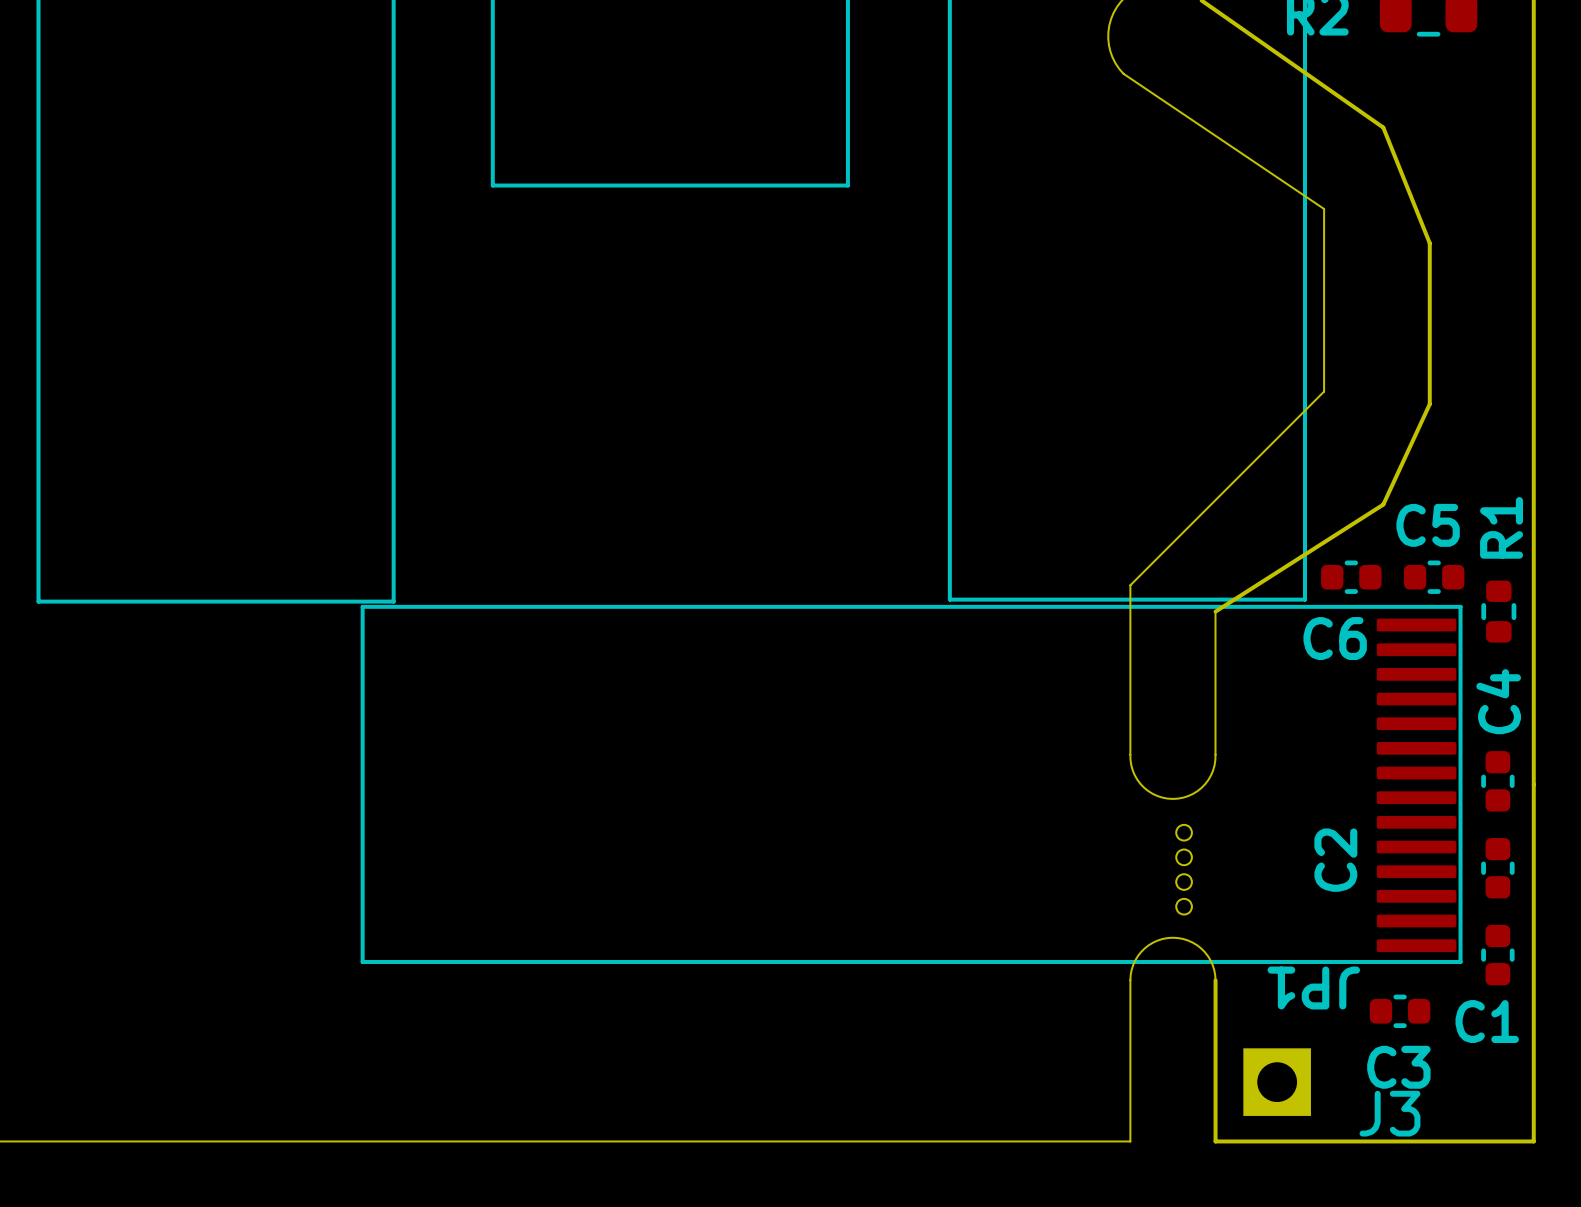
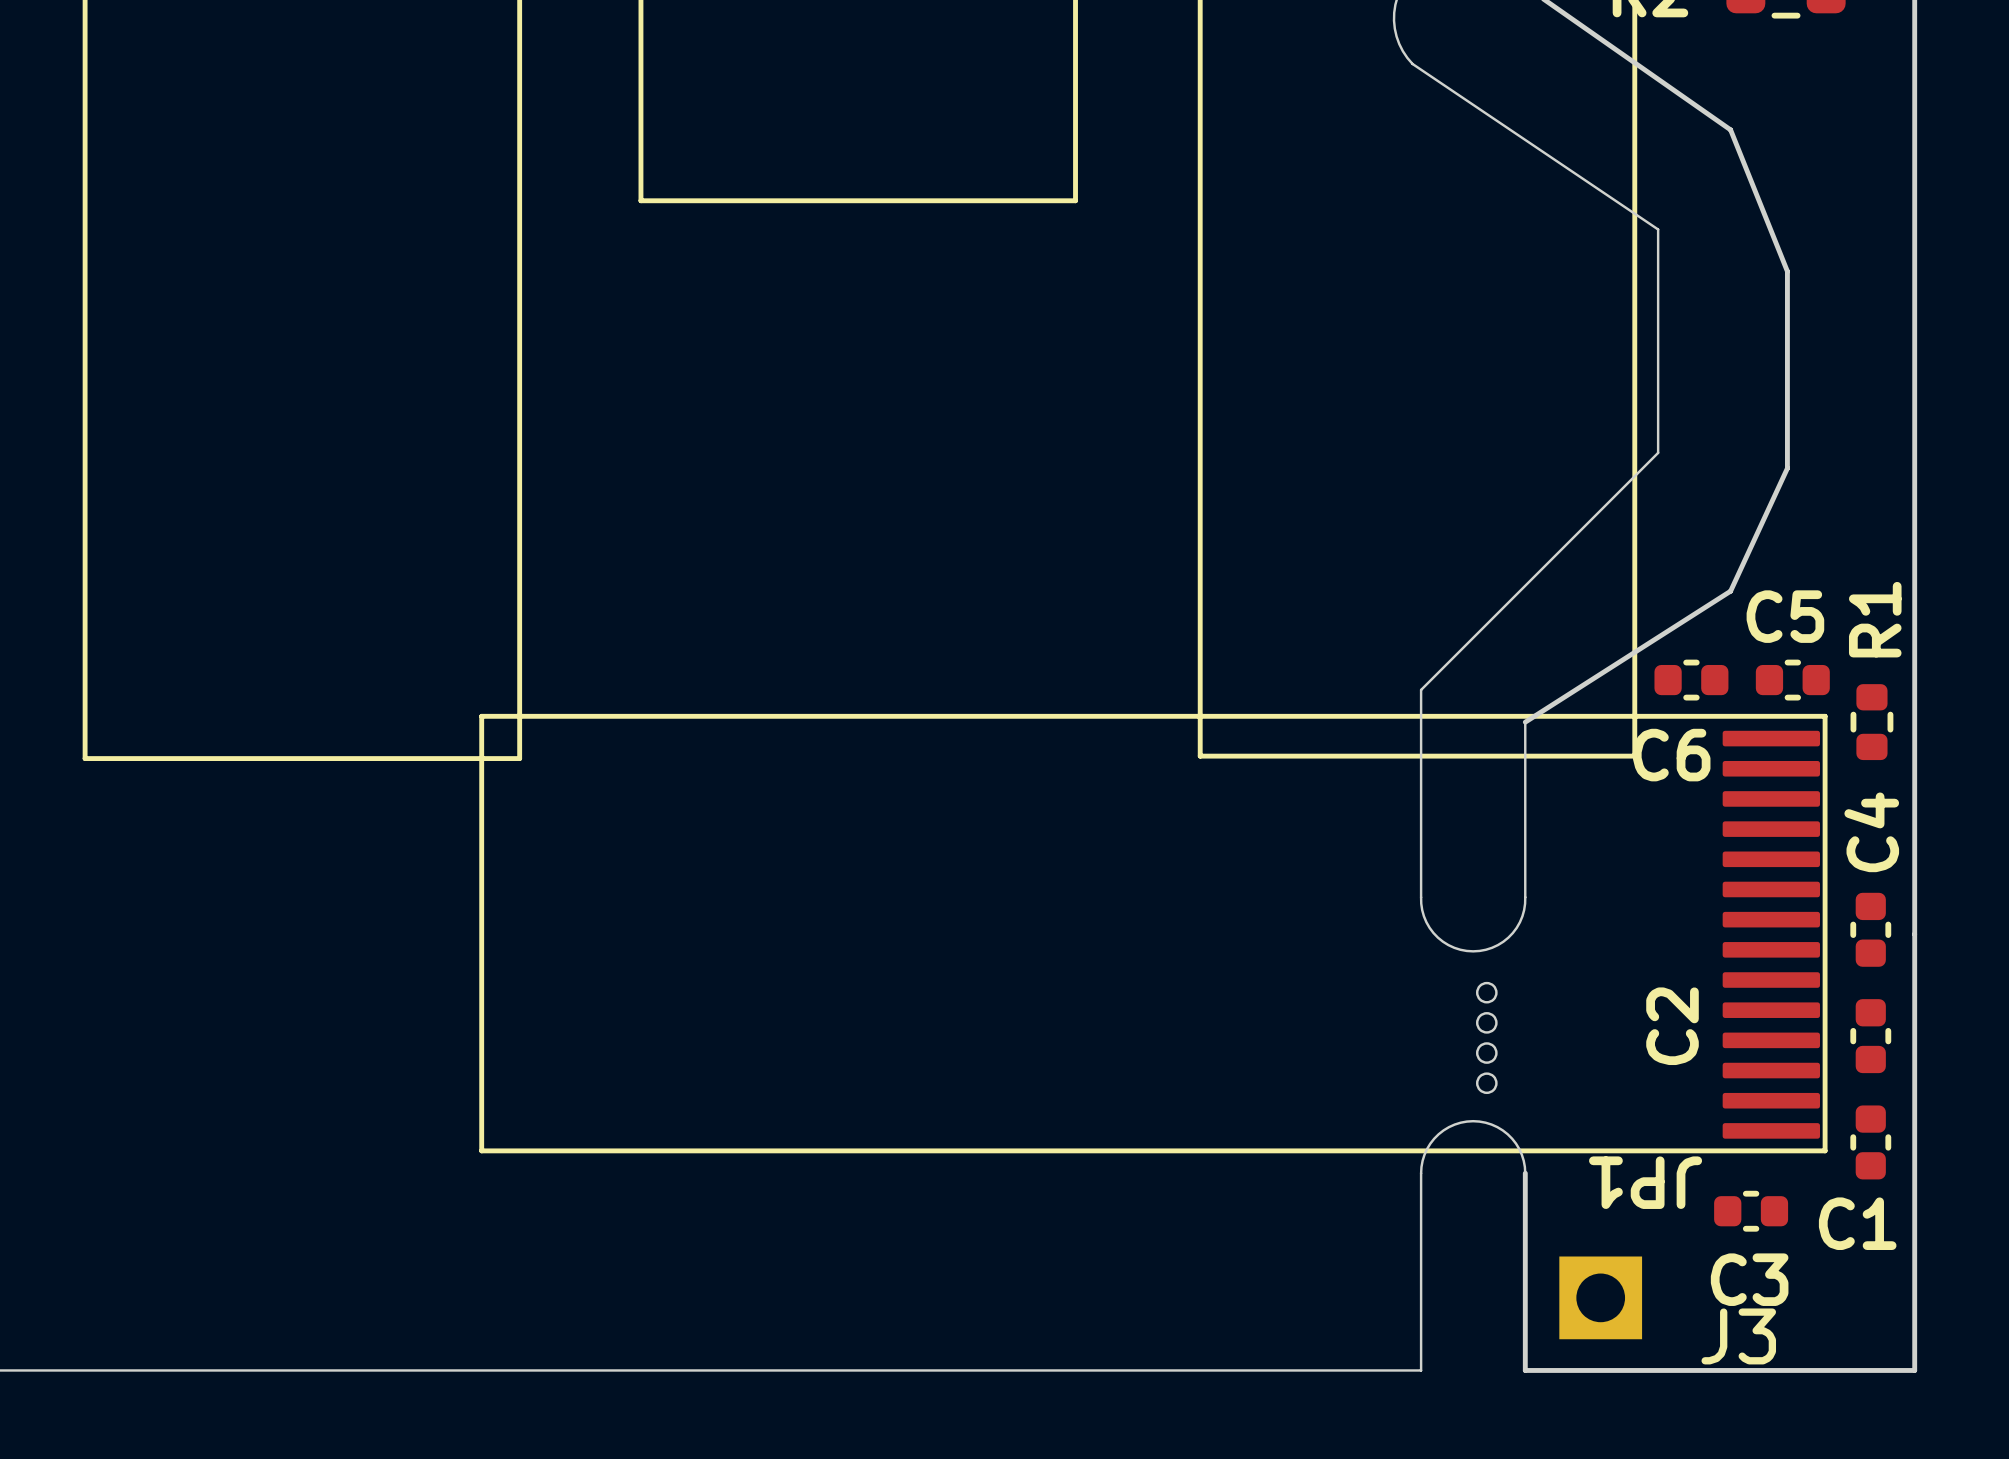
line: (949, 599) (1305, 599) -> (1200, 707) (1200, 756) (1634, 756) (1634, 707)
line: (38, 601) (393, 601) -> (85, 709) (85, 758) (519, 758) (519, 709)

